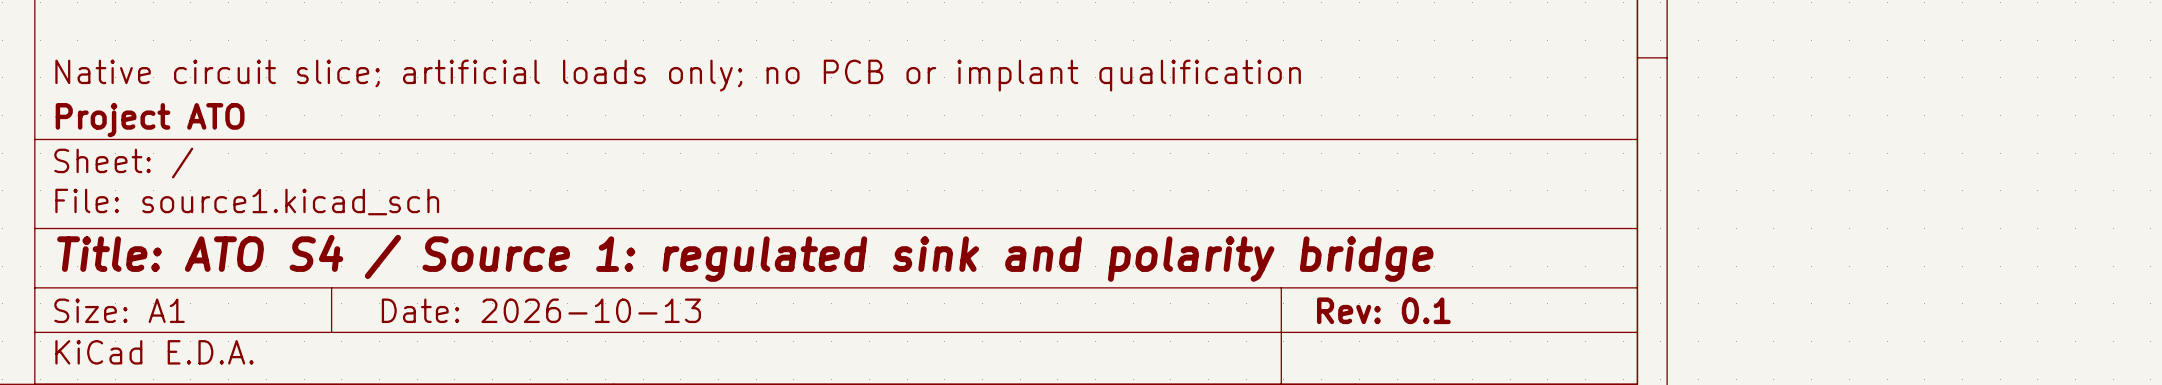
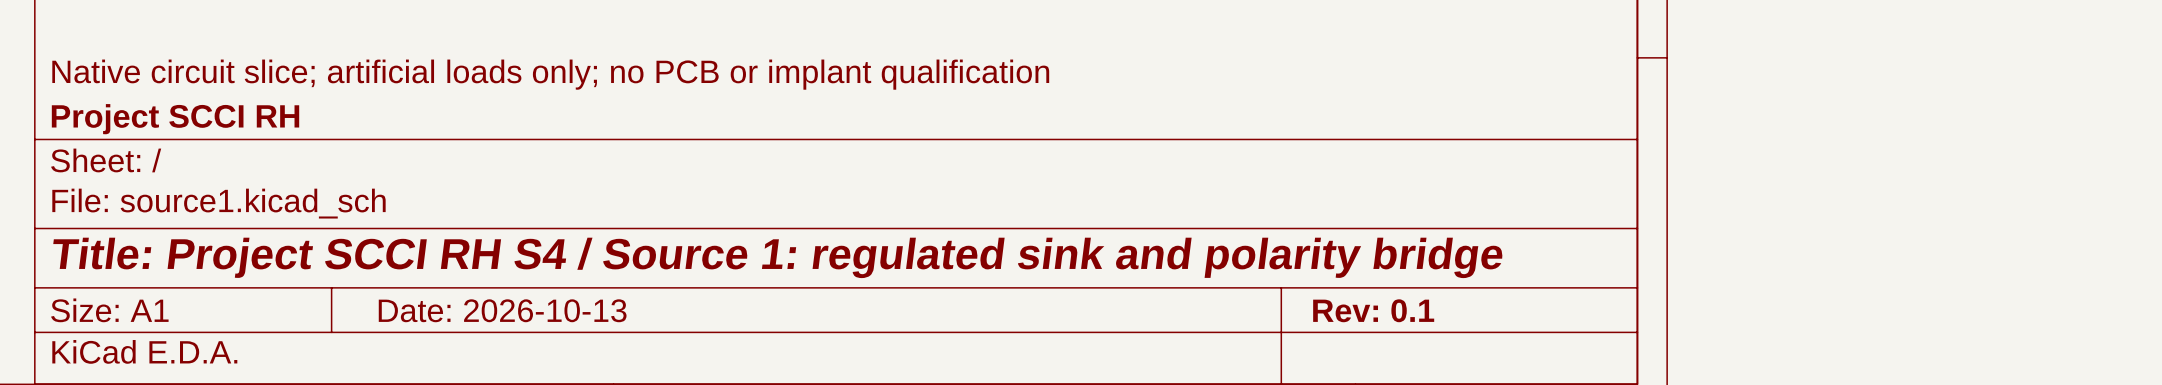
title block: Project ATO (150, 120) -> Project SCCI RH (175, 119)
title block: Title: ATO S4 / Source 1: regulated sink and polarity bridge (745, 258) -> Title: Project SCCI RH S4 / Source 1: regulated sink and polarity bridge (778, 257)

